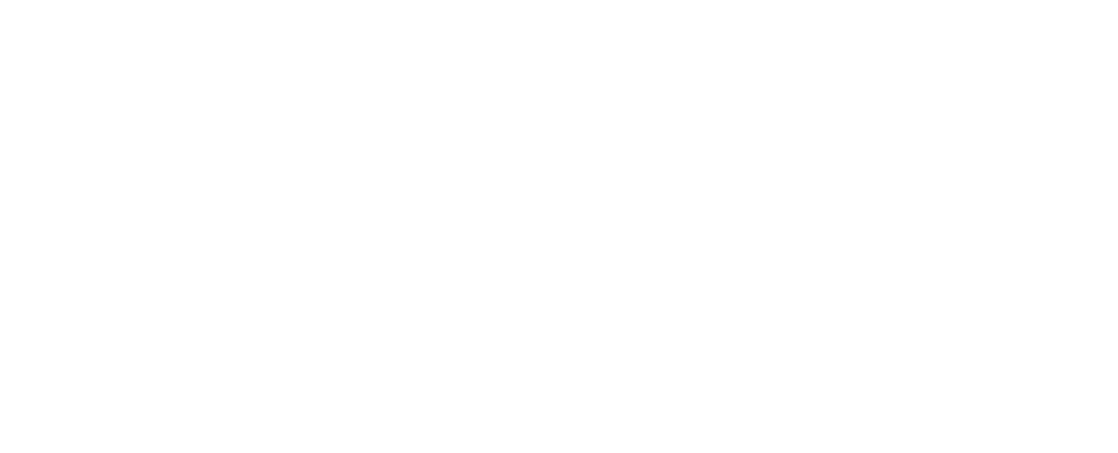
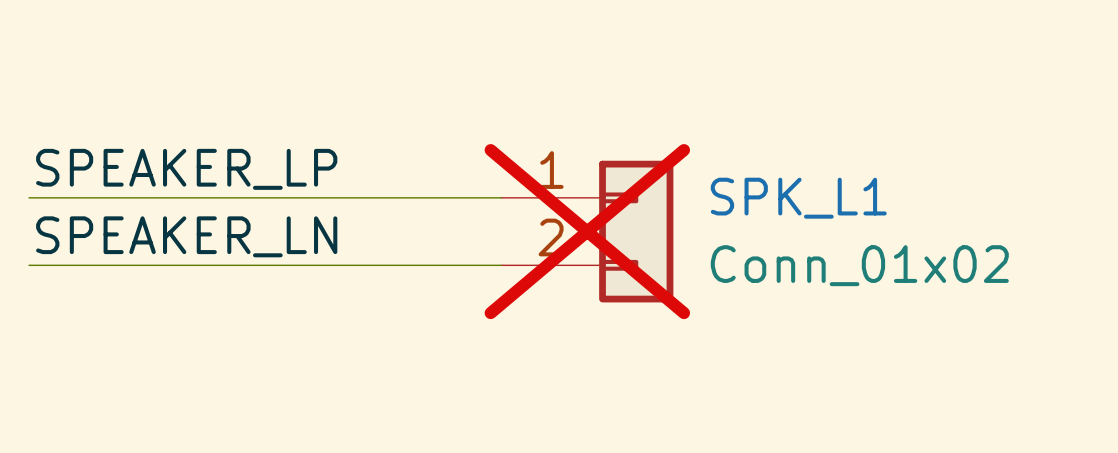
label: none -> SPEAKER_LP (186, 169)
wire: none -> (29, 197) (501, 197)
SPK_L1: none -> Conn_01x02 (587, 231)
label: none -> SPEAKER_LN (186, 236)
wire: none -> (29, 265) (501, 265)

